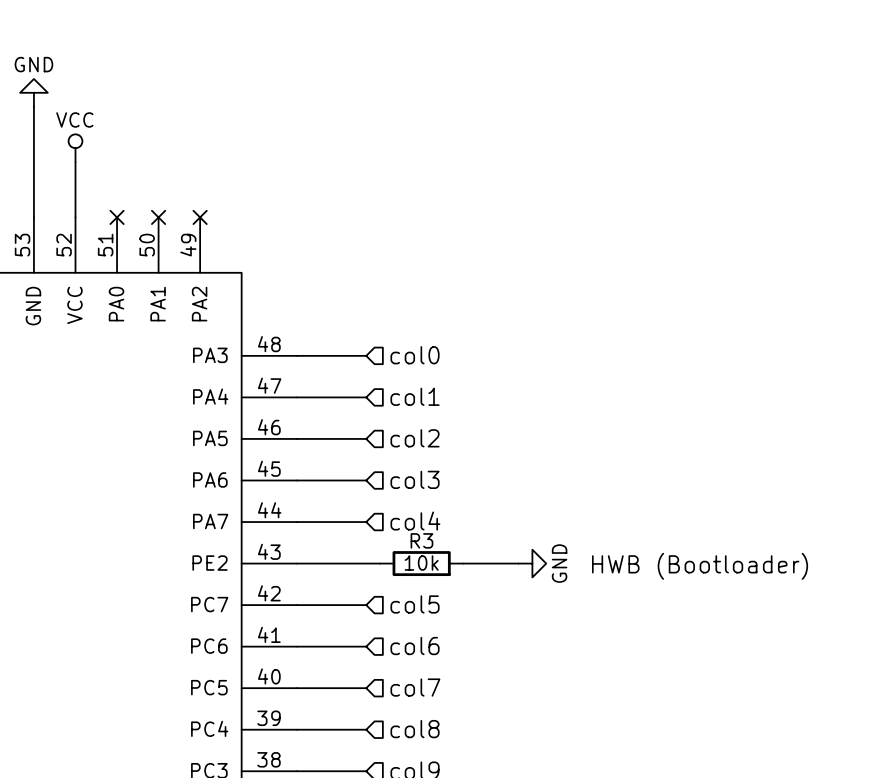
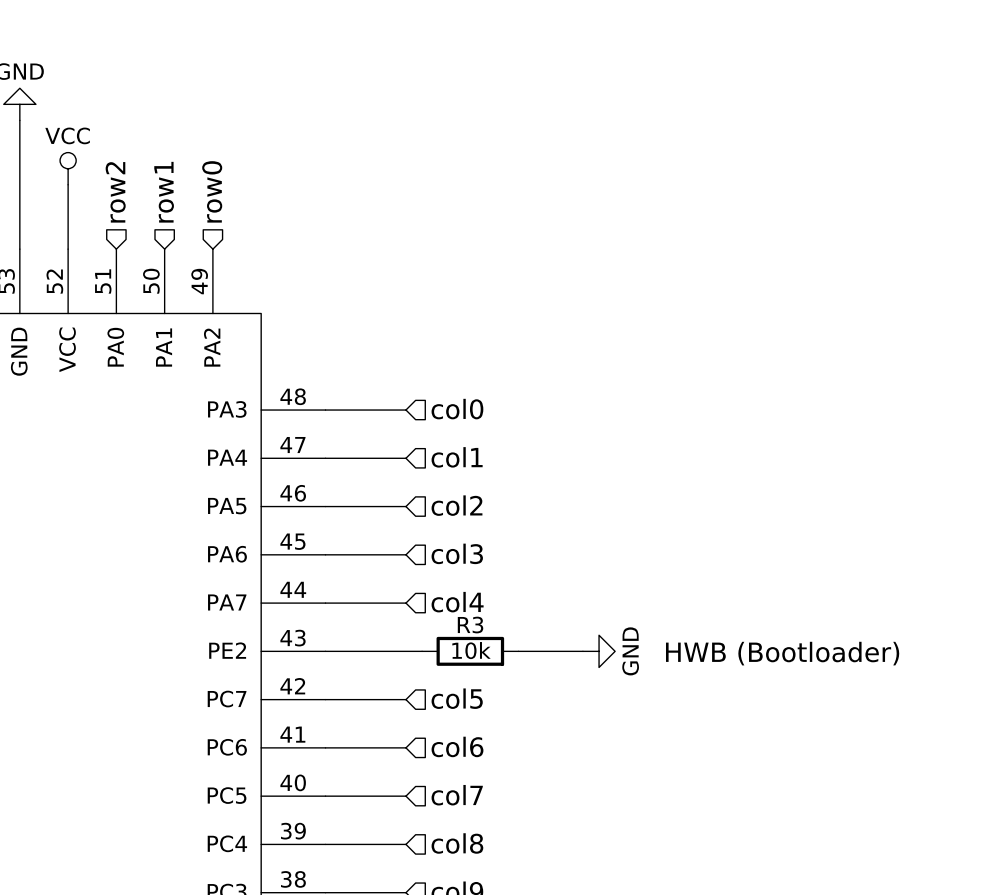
hierarchical label: none -> row2 (115, 192)
hierarchical label: none -> row1 (164, 192)
hierarchical label: none -> row0 (212, 191)
no-connect mark: (117, 217) -> none
no-connect mark: (158, 217) -> none
no-connect mark: (200, 217) -> none

